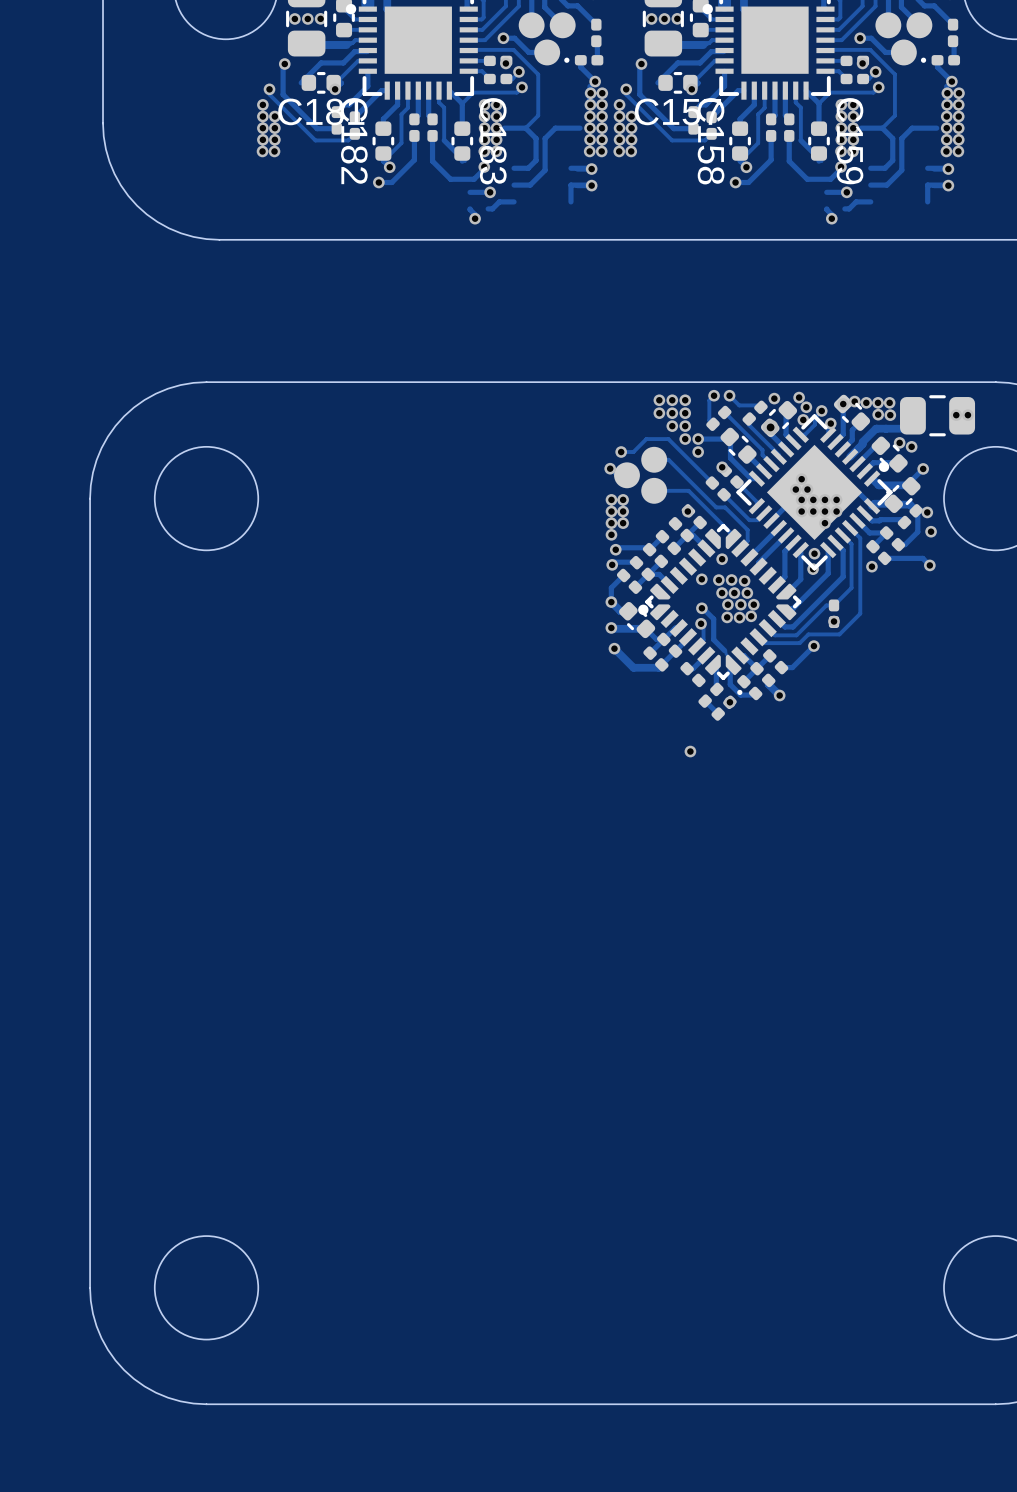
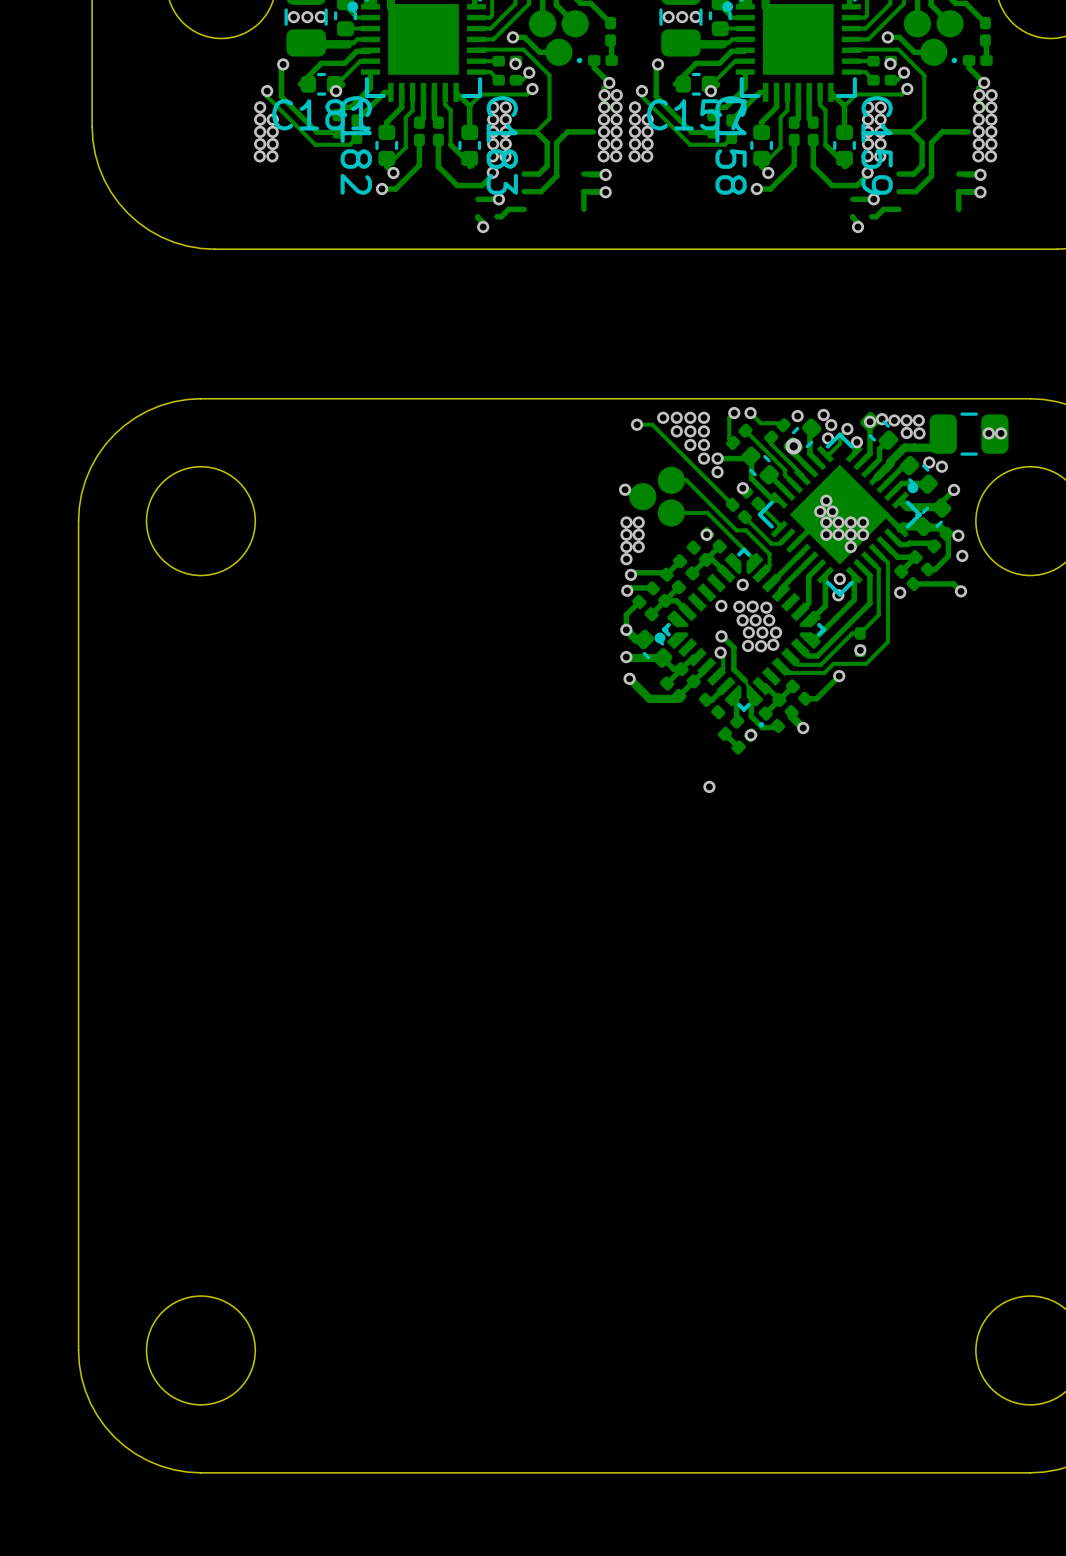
via: none -> (663, 417)
via: none -> (637, 424)
track: (668, 439) (646, 439) (633, 452) (621, 452) -> (686, 458) (652, 424) (637, 424) (637, 427)
via: (621, 452) -> none

